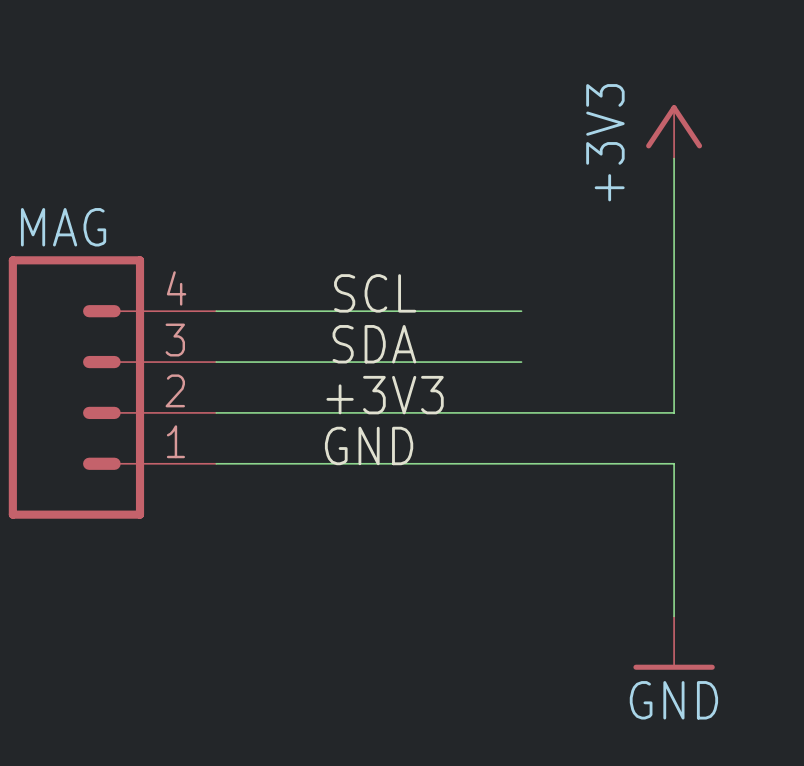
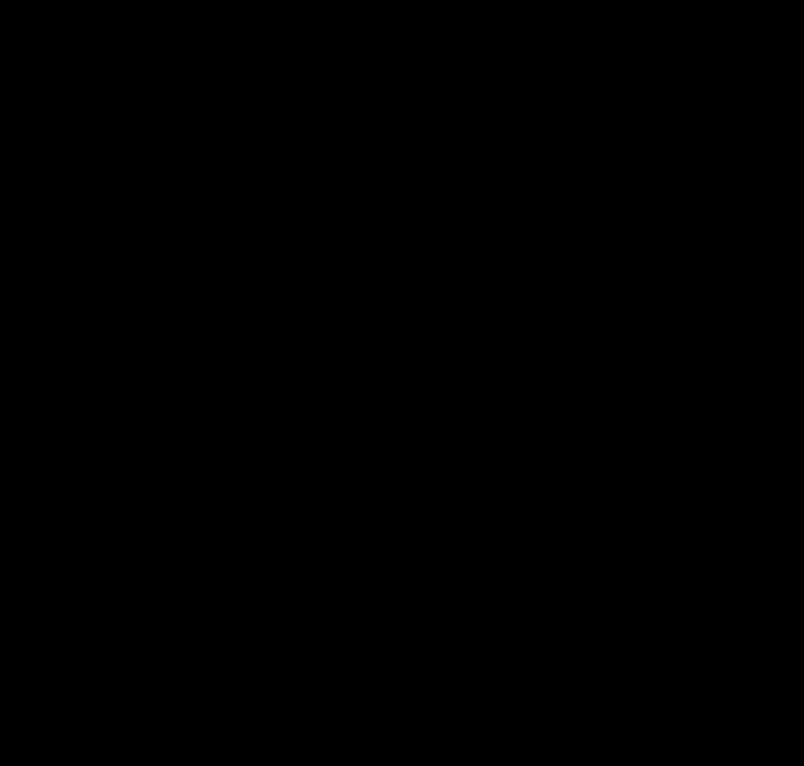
power symbol: +3V3 (674, 131) -> none
wire: (674, 158) (674, 412) (216, 412) -> none
label: SCL (375, 293) -> none
wire: (216, 311) (521, 311) -> none
label: SDA (374, 344) -> none
wire: (216, 362) (521, 362) -> none
MAG: (112, 387) -> none
label: +3V3 (385, 395) -> none
label: GND (369, 445) -> none
wire: (216, 463) (674, 463) (674, 616) -> none
power symbol: GND (674, 643) -> none

